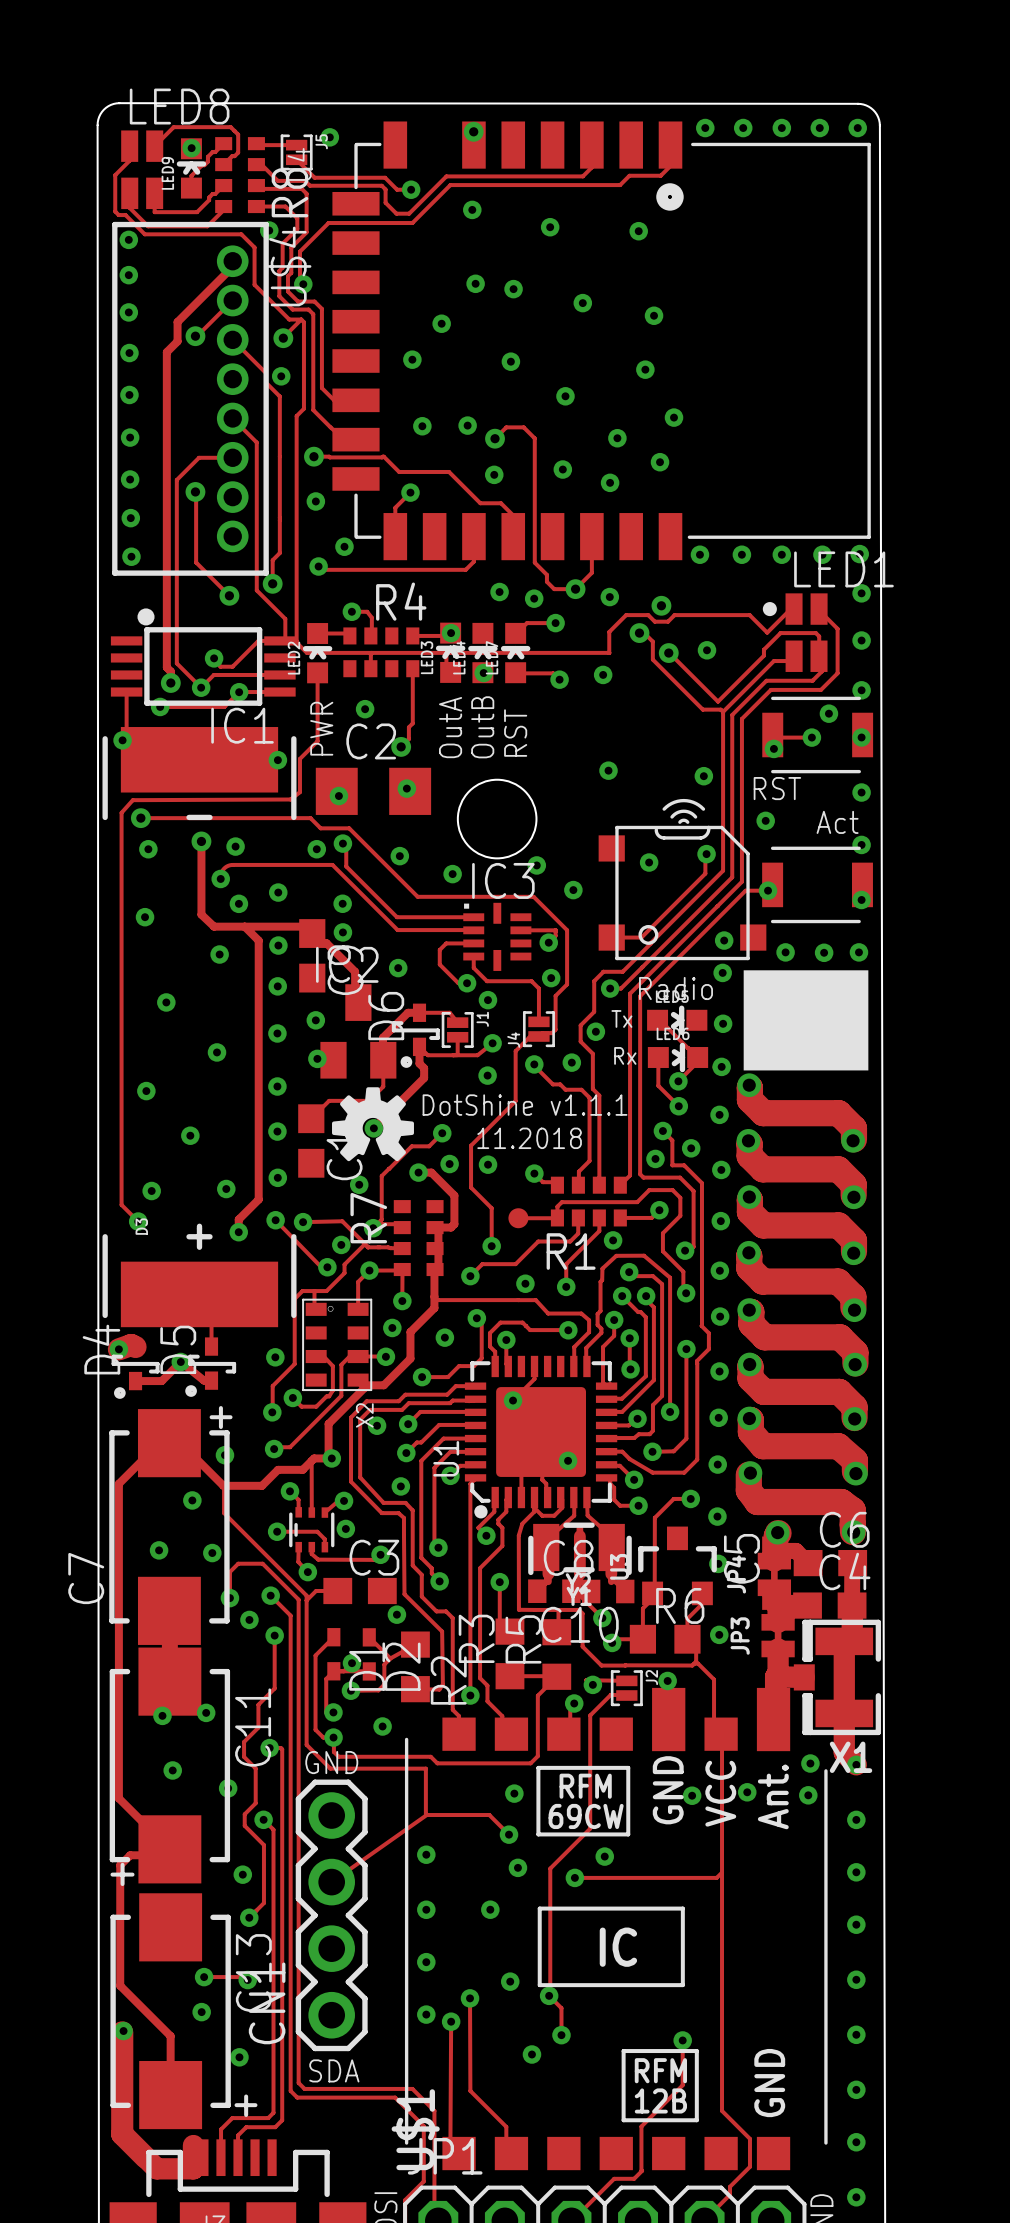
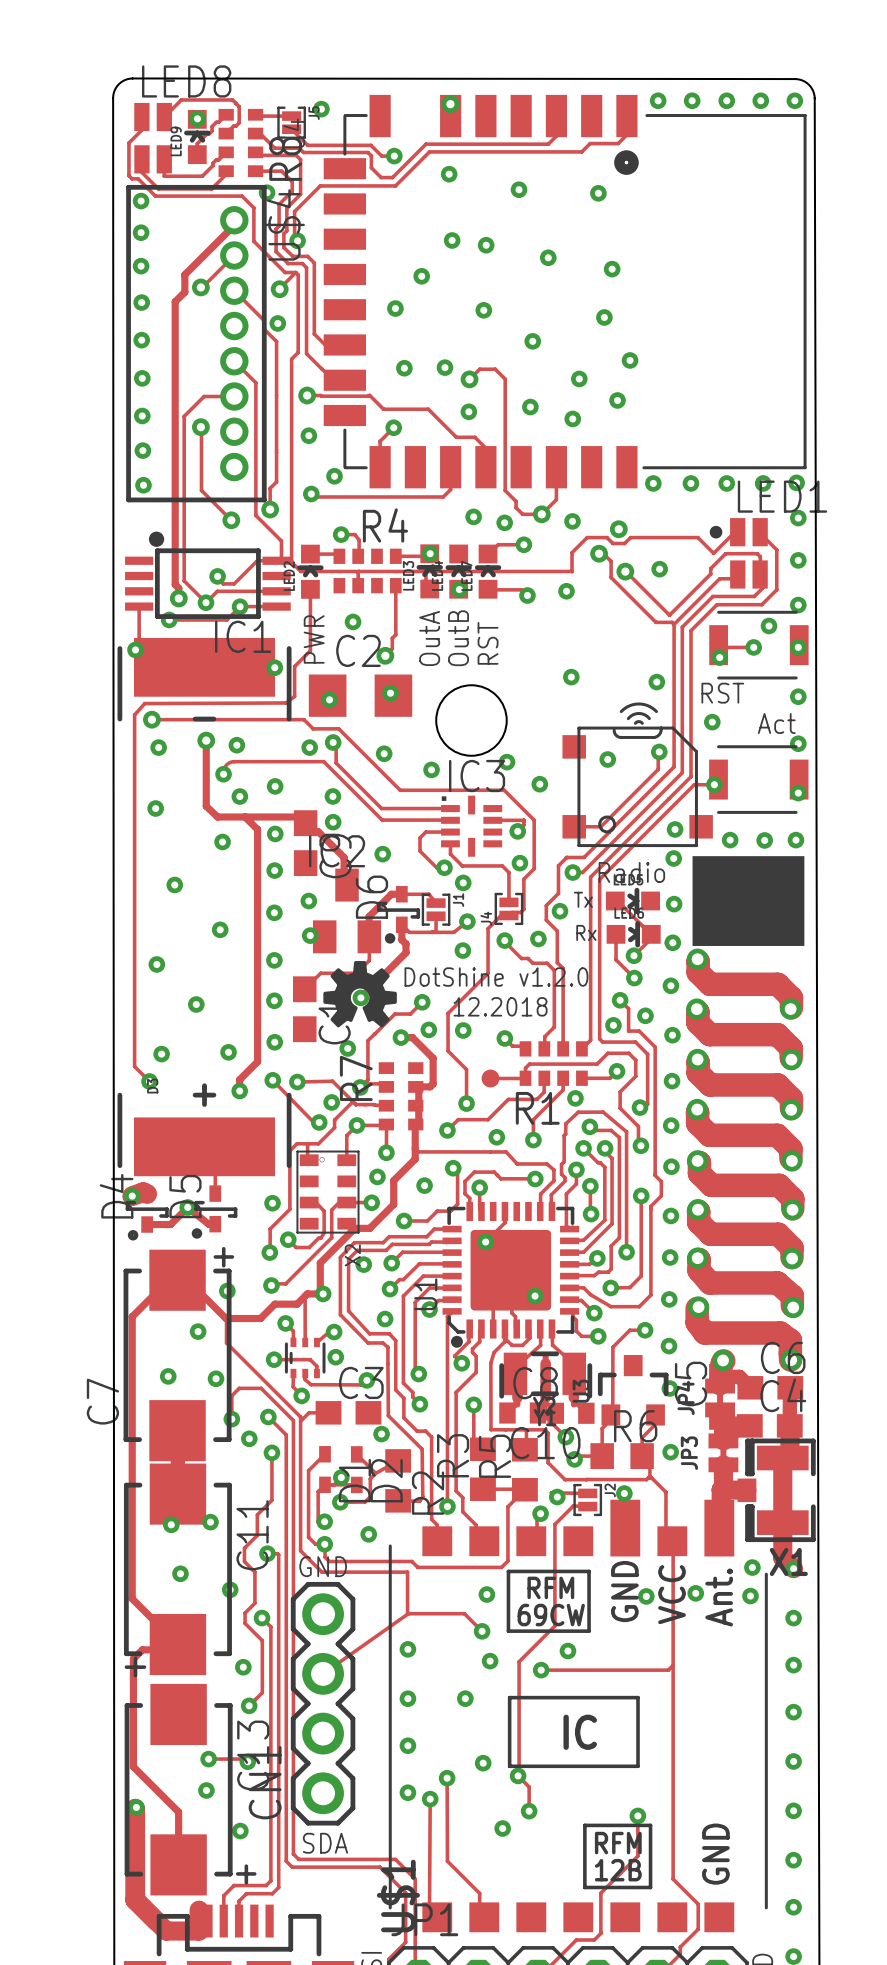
text: DotShine v1.1.1 (525, 1105) -> DotShine v1.2.0 (496, 977)
text: 11.2018 (529, 1138) -> 12.2018 (500, 1006)

